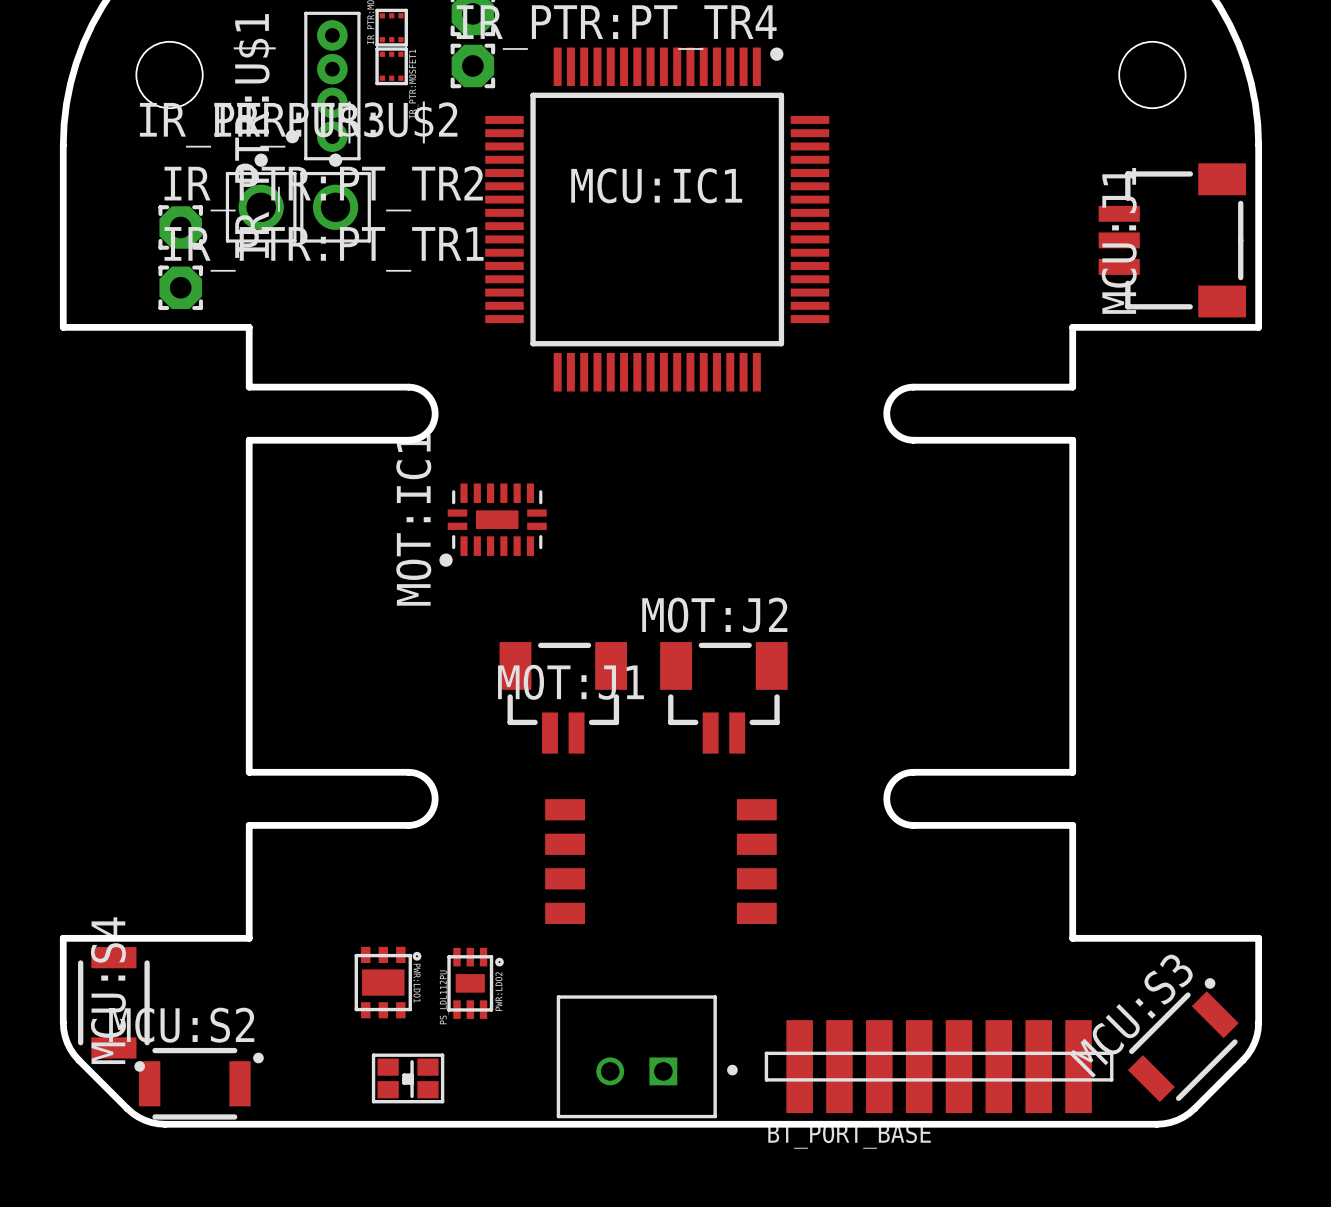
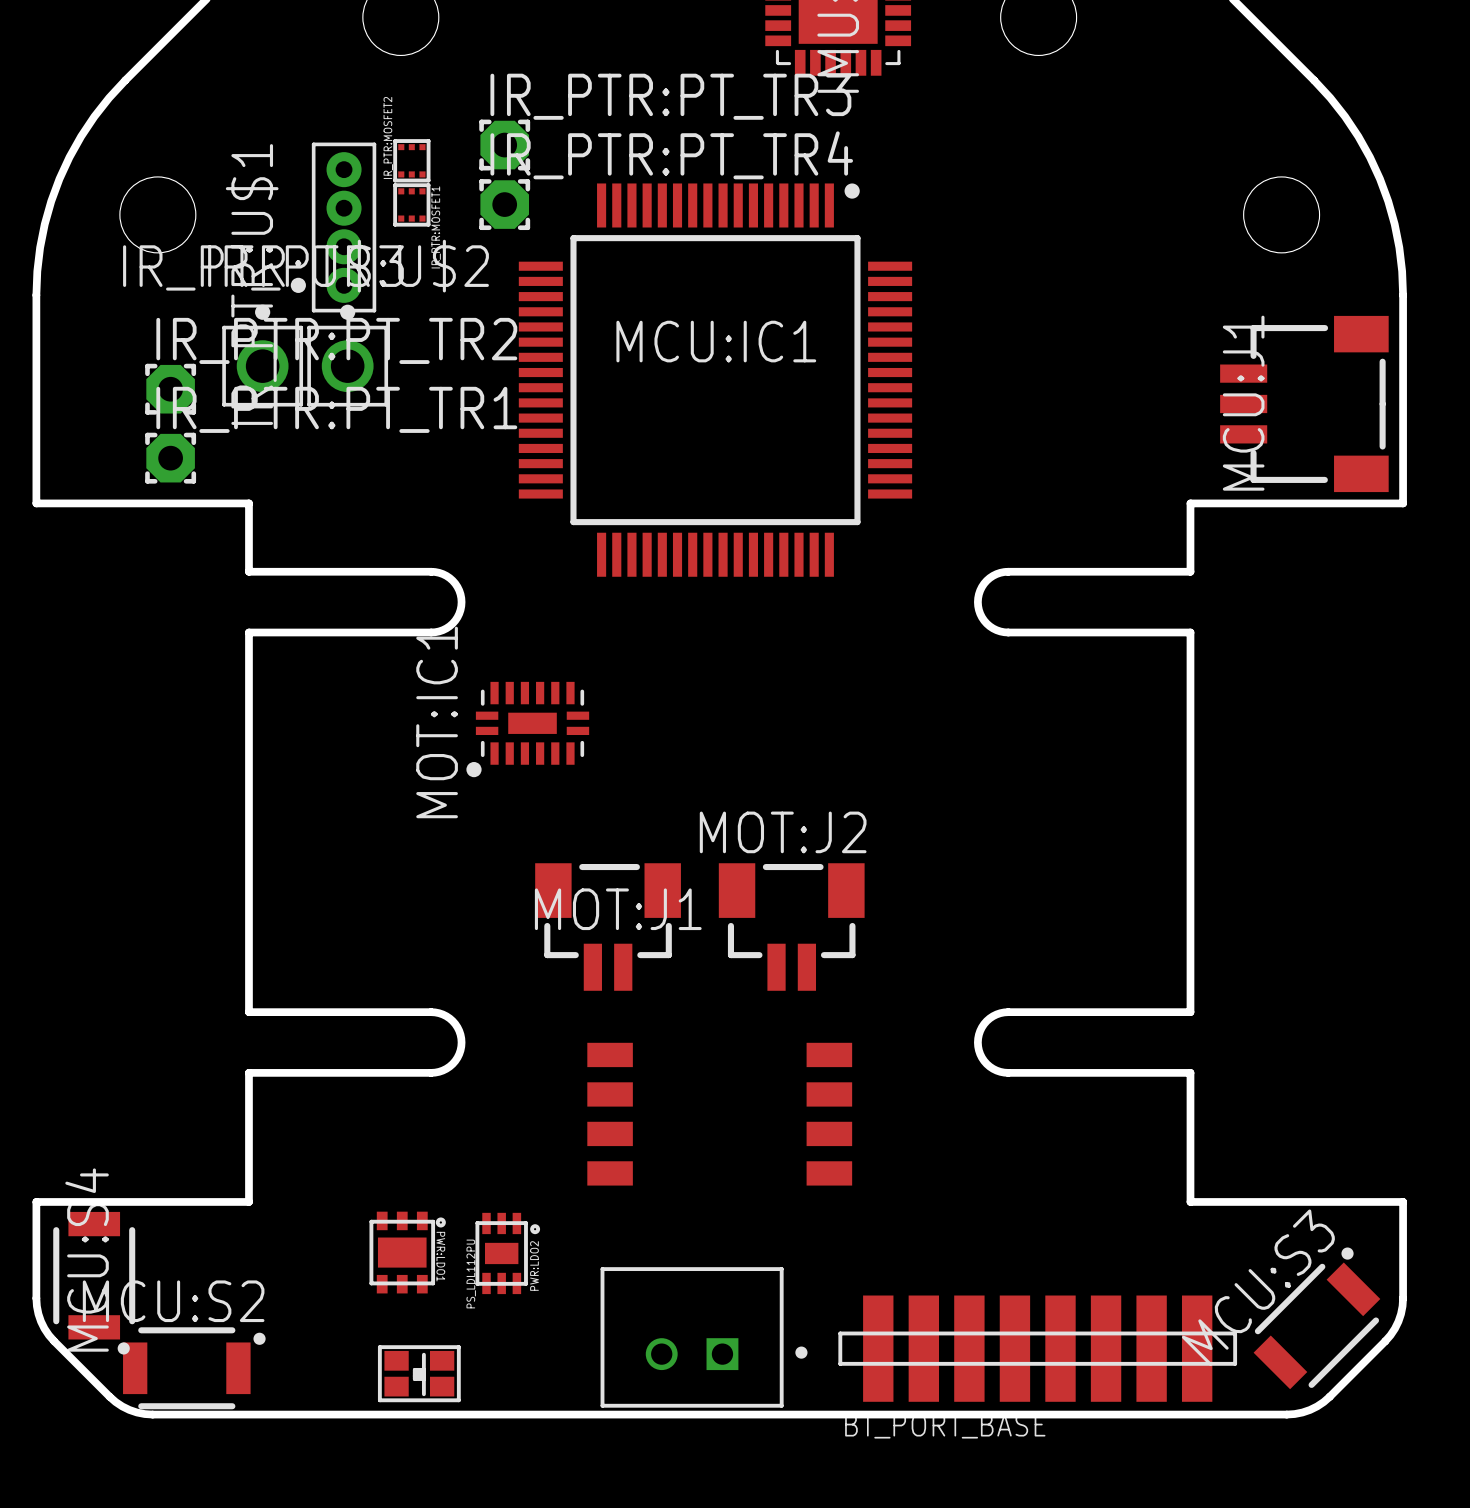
part position: (408, 1078) -> (419, 1373)

